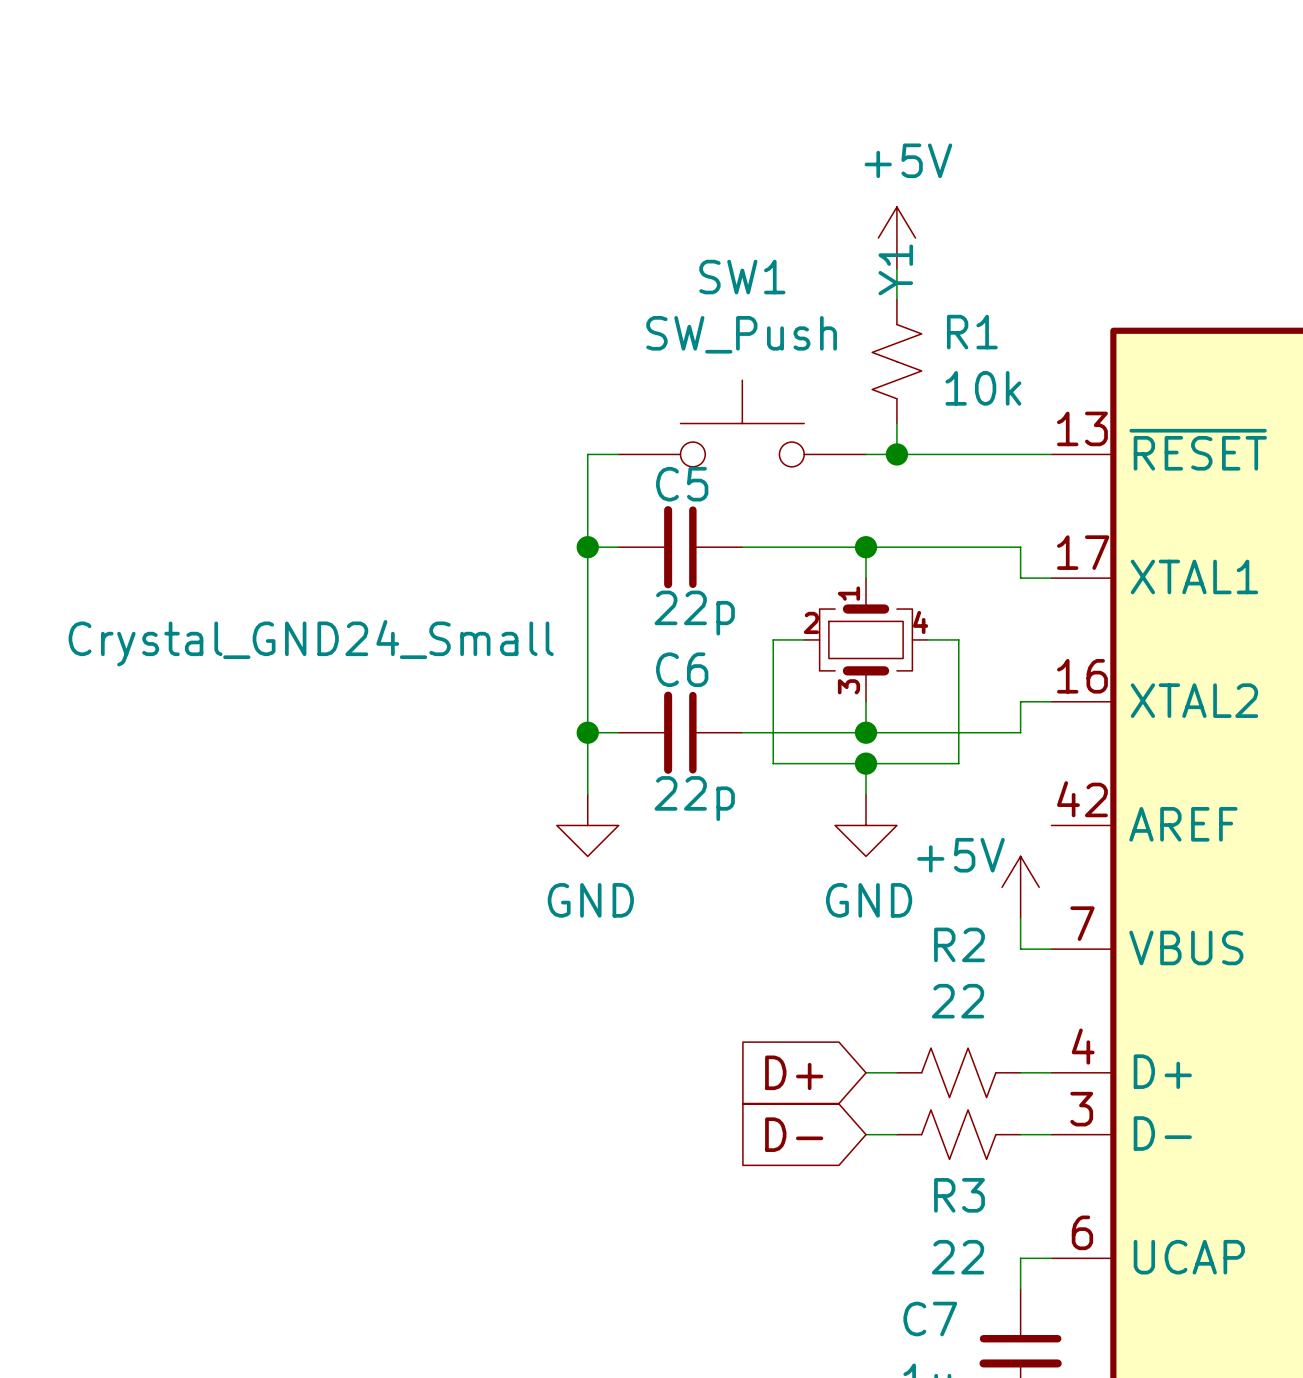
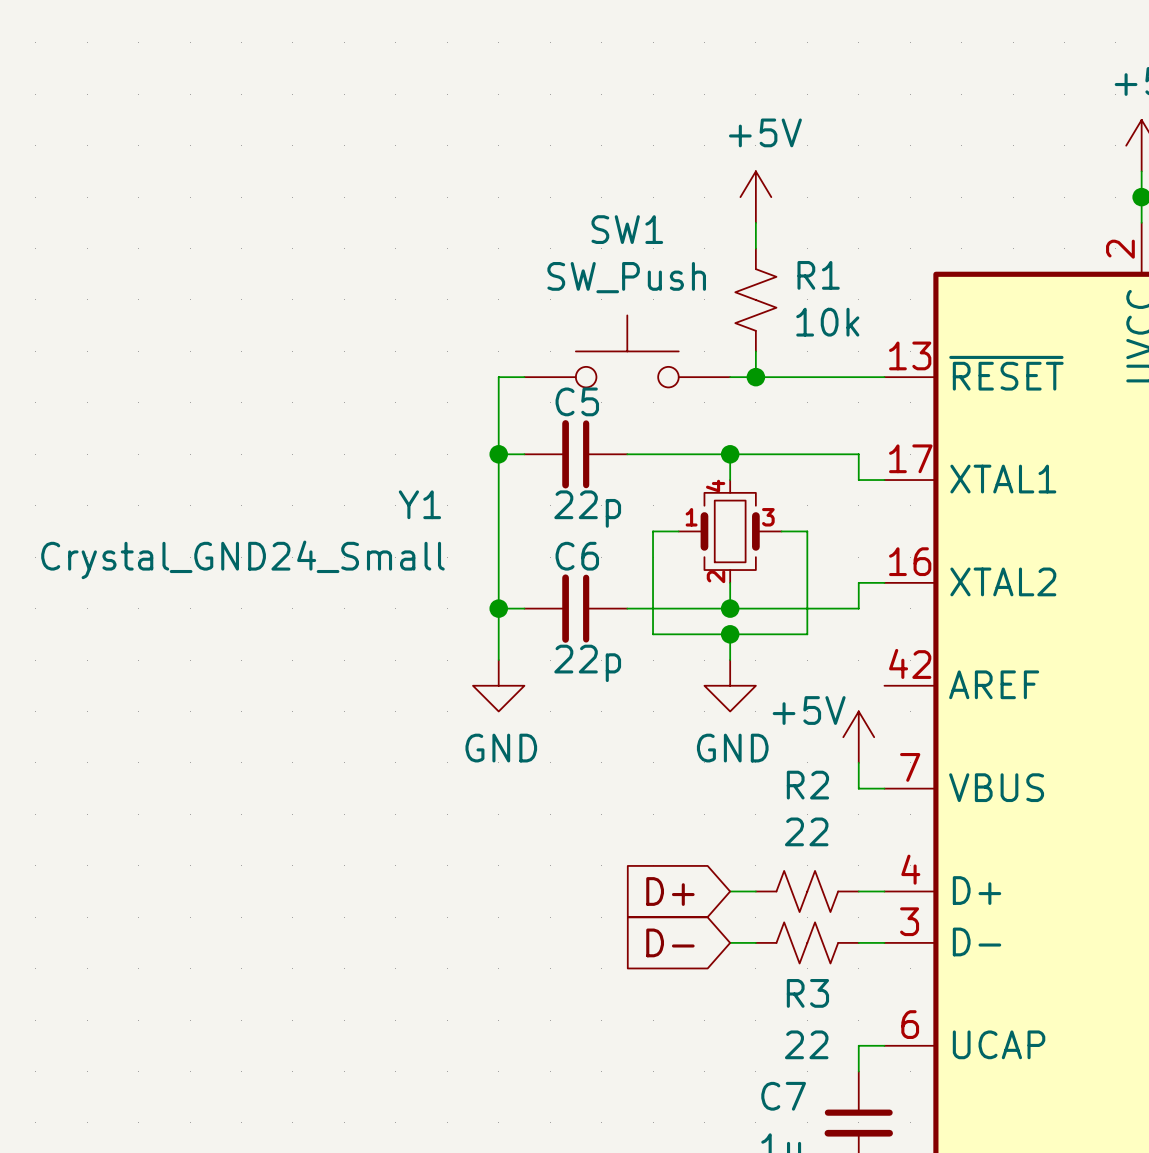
Y1 rotation: 0° (866, 639) -> 90° counterclockwise (730, 531)

